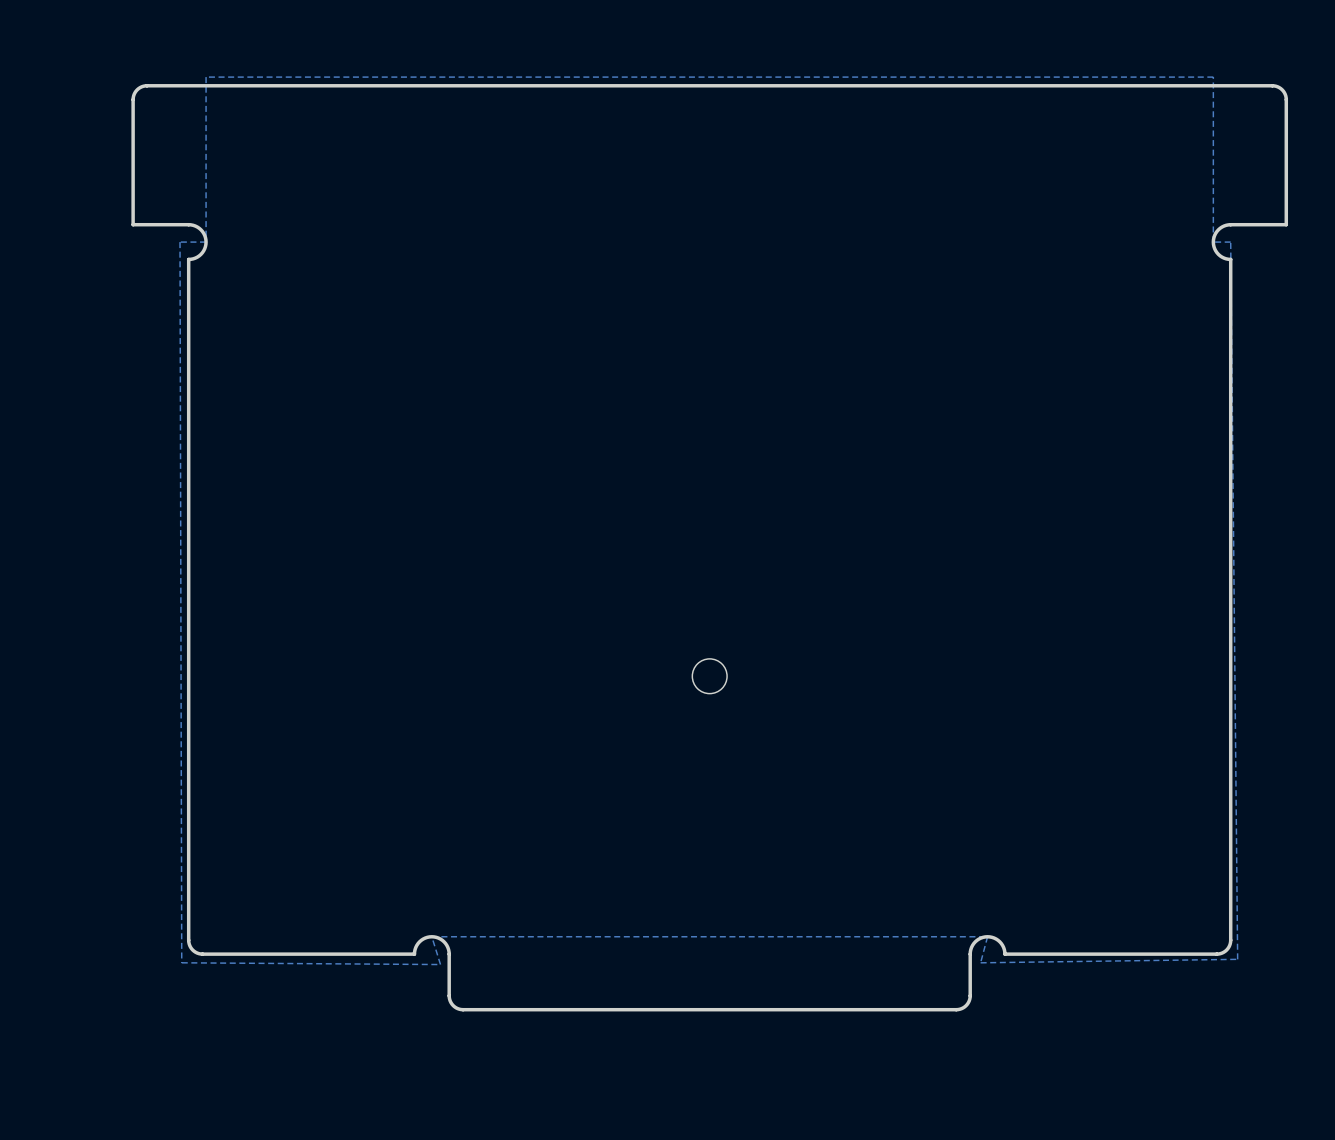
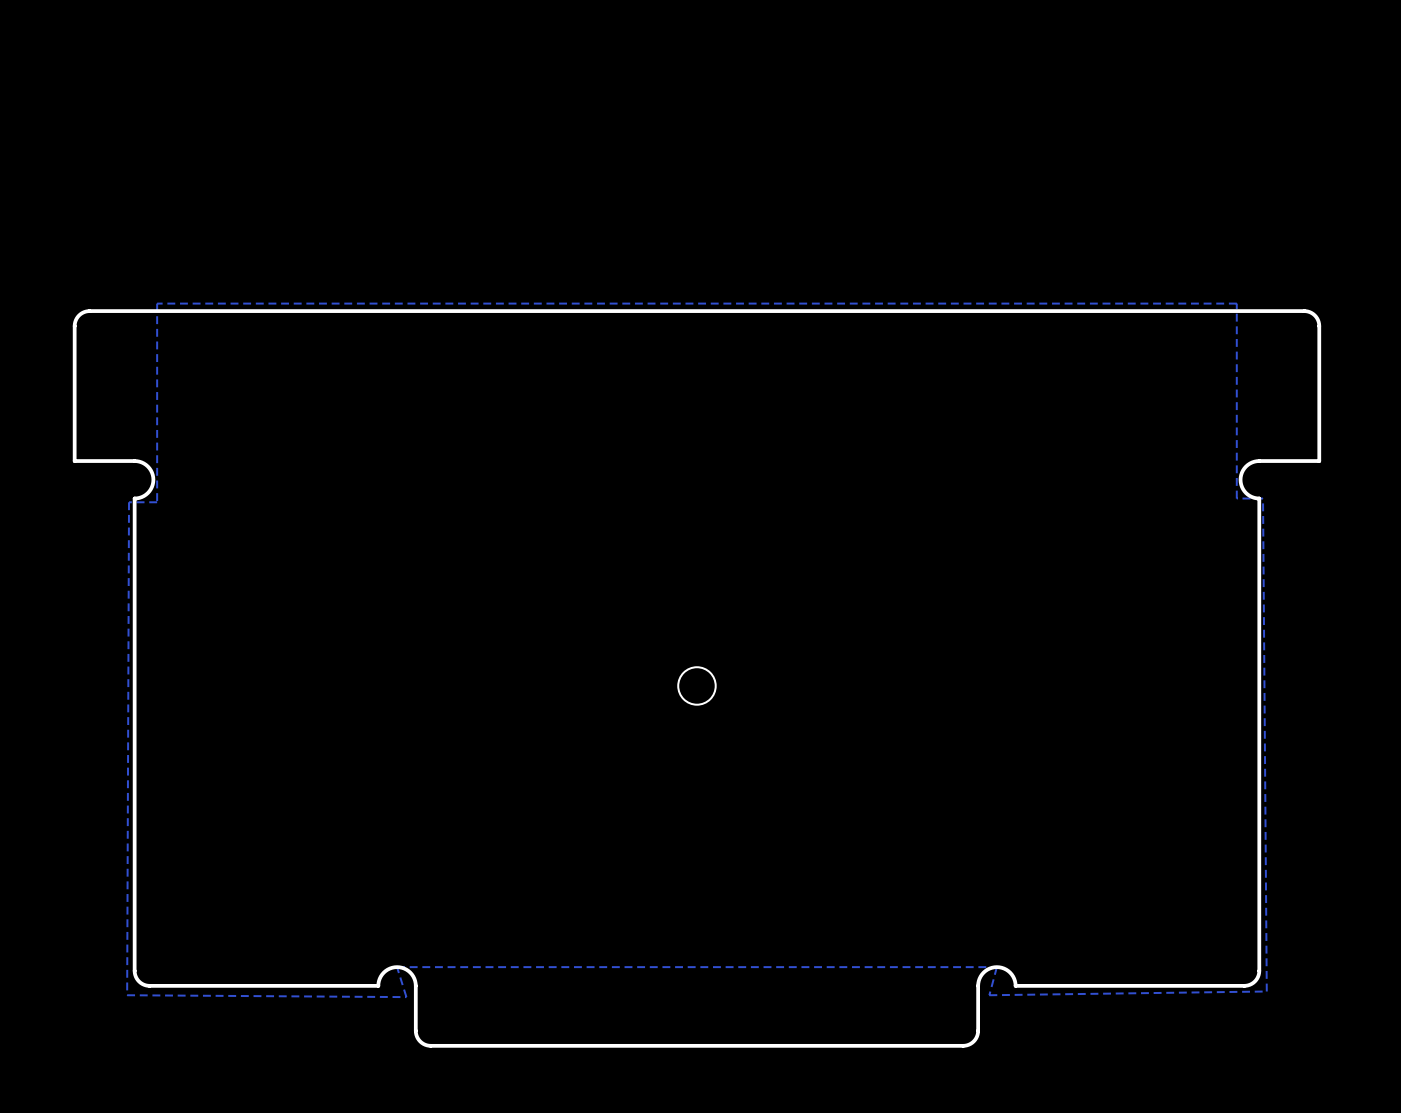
board edge: (1230, 502) (1230, 259) (1218, 254) (1213, 246) (1213, 239) (1218, 229) (1226, 225) (1286, 224) (1286, 97) (1282, 89) (1274, 85) (141, 86) (135, 91) (133, 99) (133, 224) (193, 225) (200, 229) (205, 239) (205, 246) (200, 254) (188, 259) (188, 502) -> (1259, 498) (1247, 494) (1241, 484) (1241, 472) (1249, 463) (1259, 461) (1319, 461) (1319, 324) (1314, 315) (1308, 311) (85, 311) (79, 315) (74, 324) (74, 461) (134, 461) (144, 463) (151, 472) (152, 484) (146, 494) (134, 498)
zone outline: (1237, 959) (1230, 242) (1213, 242) (1213, 77) (206, 77) (206, 242) (180, 242) (181, 962) -> (1266, 991) (1263, 498) (1236, 498) (1236, 303) (157, 303) (157, 502) (129, 502) (127, 995)

